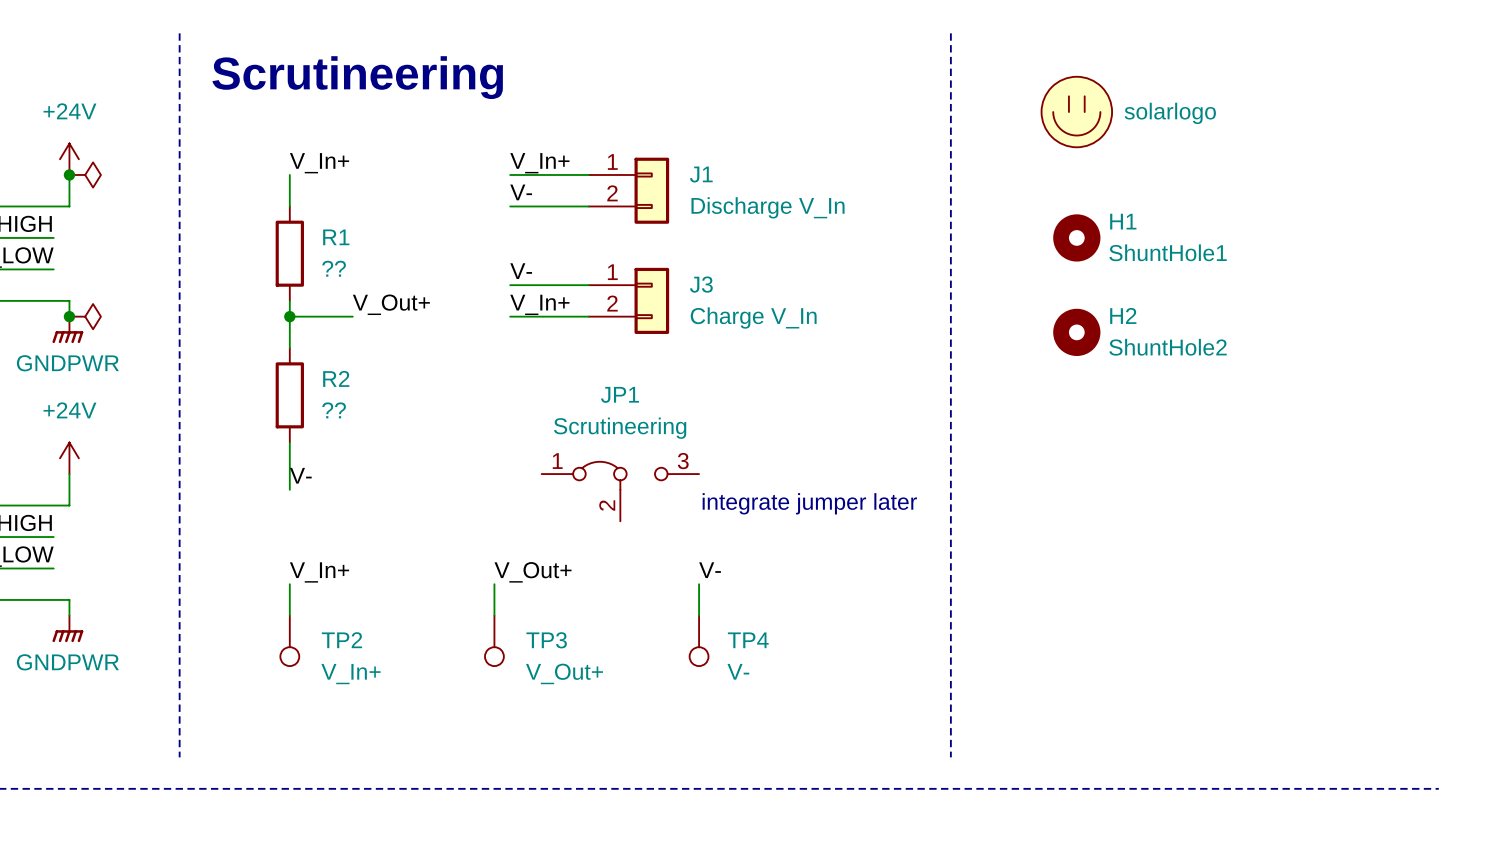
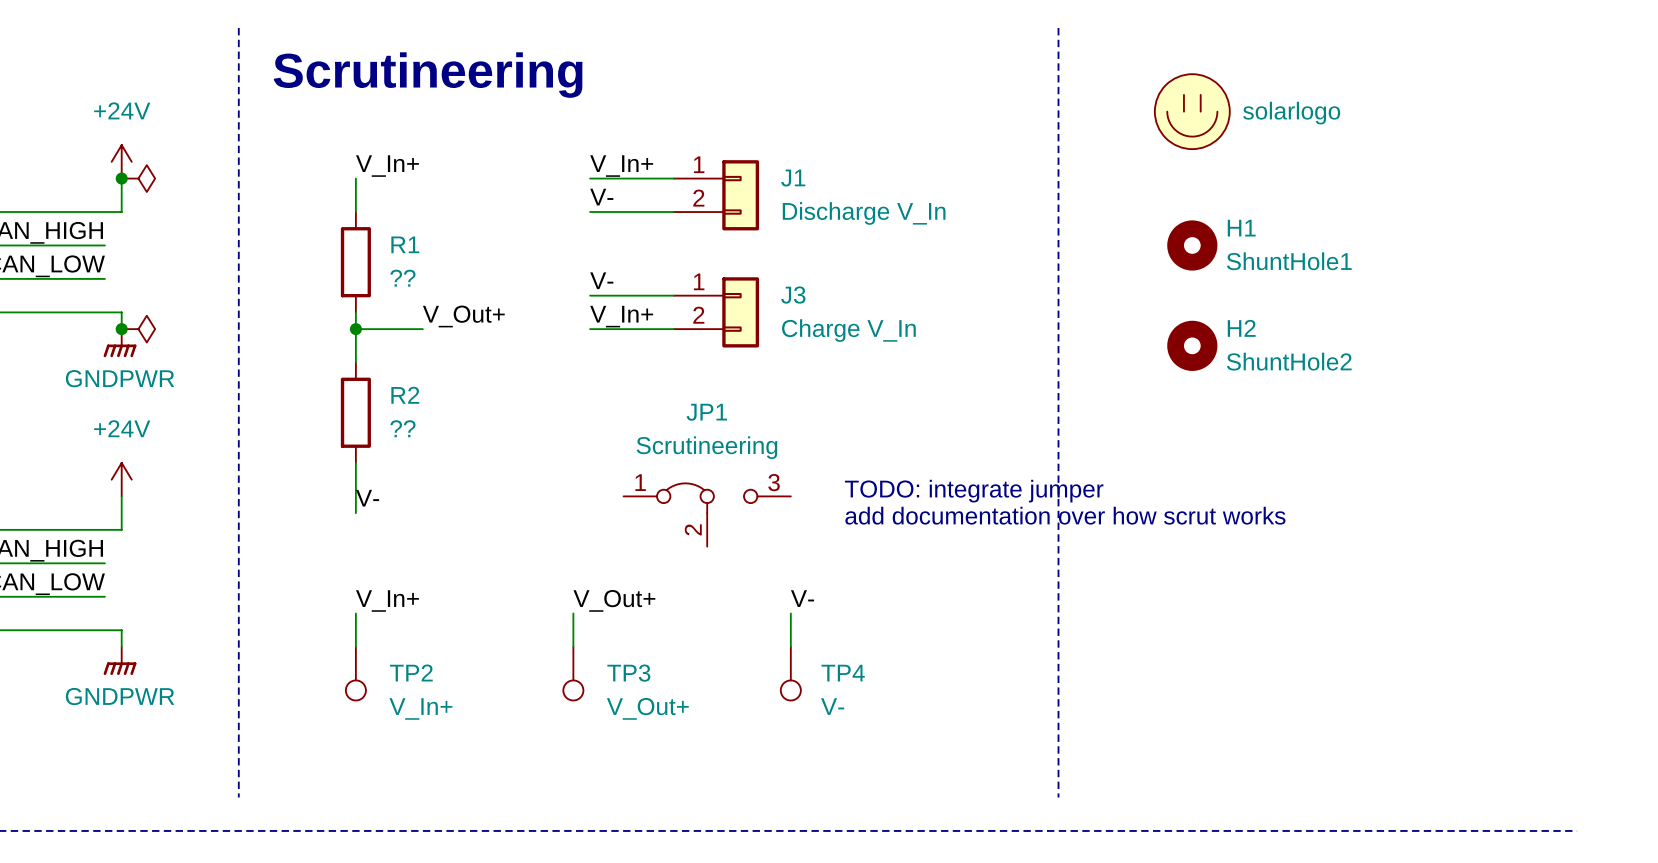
text: none -> TODO: integrate jumper (974, 491)
text: none -> add documentation over how scrut works (1065, 515)
text: integrate jumper later (809, 503) -> none

